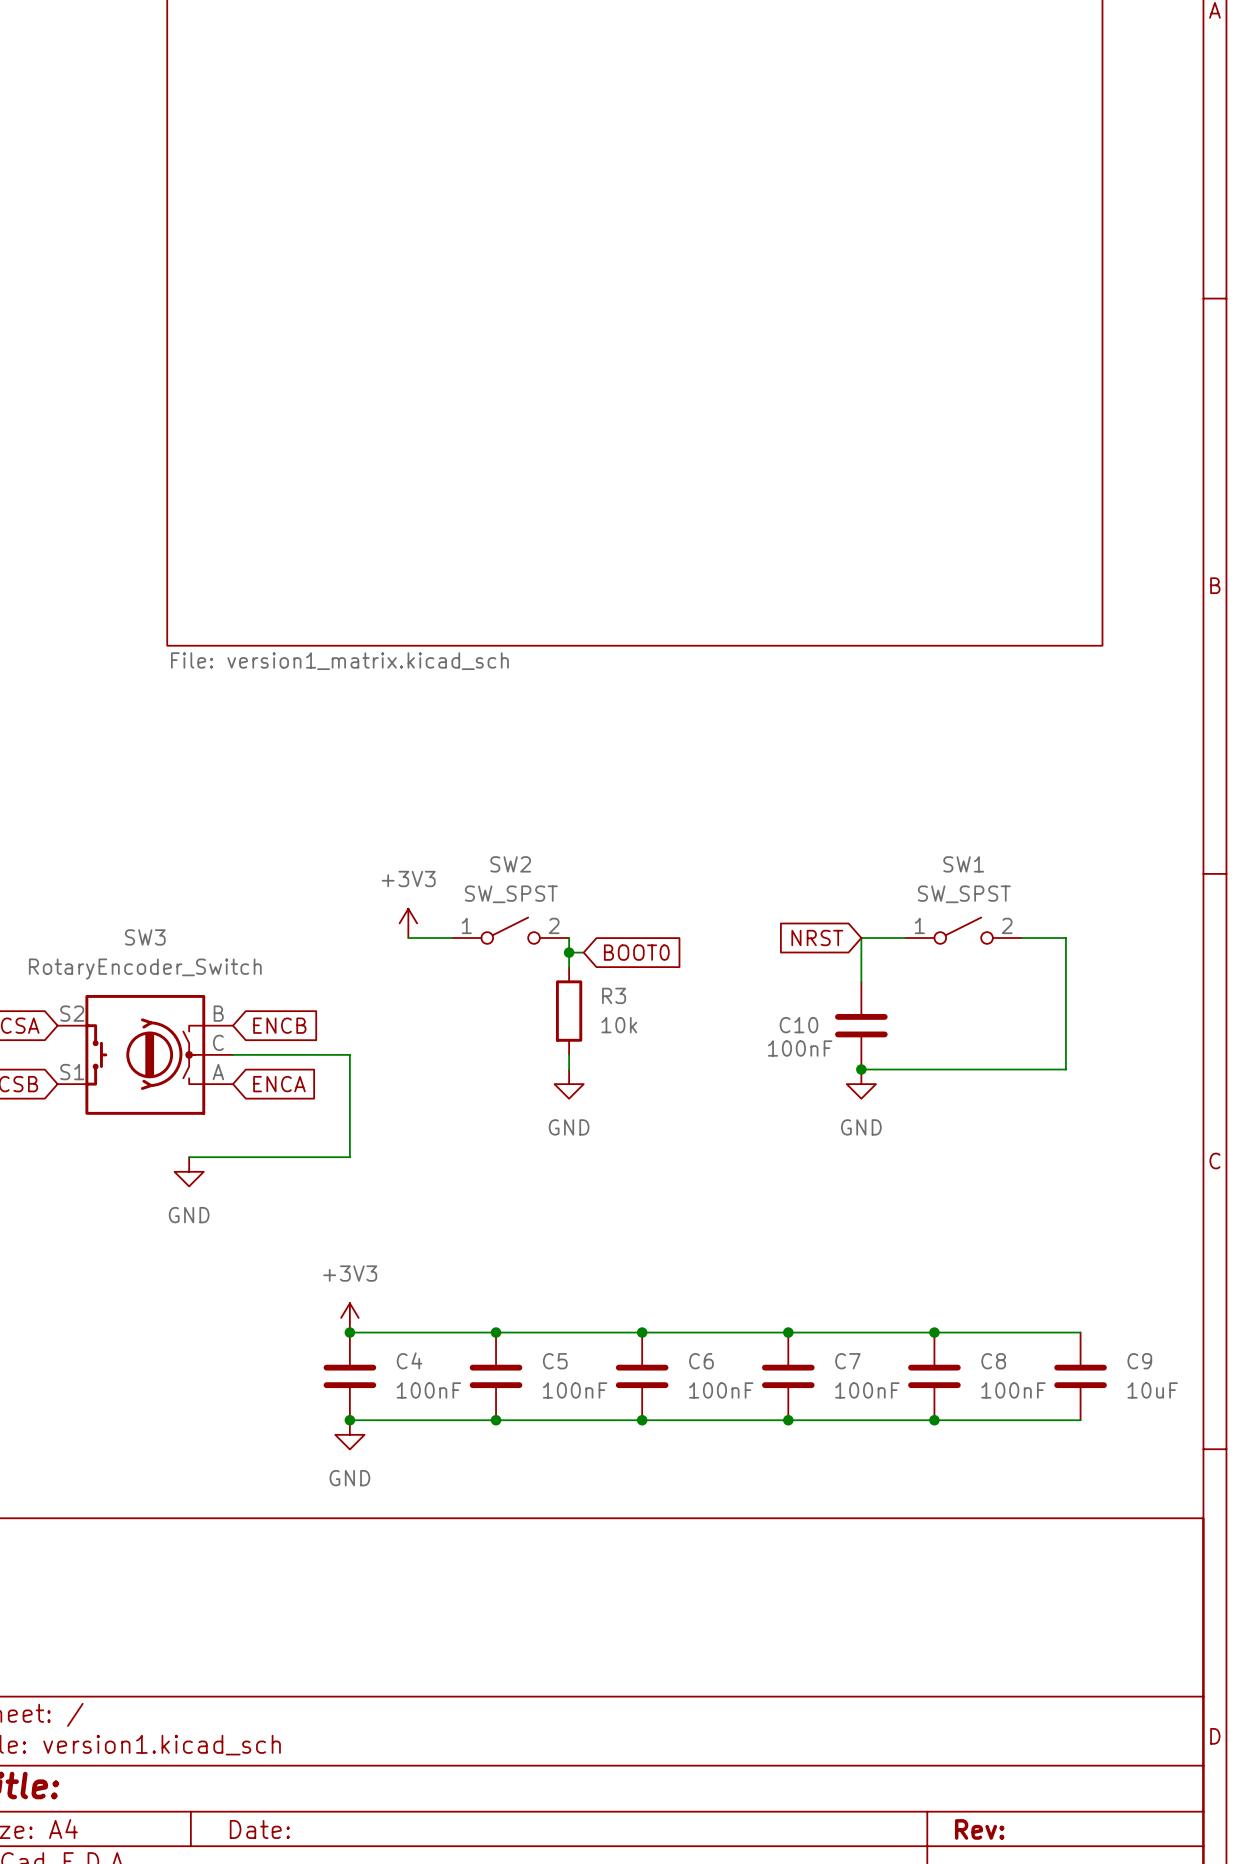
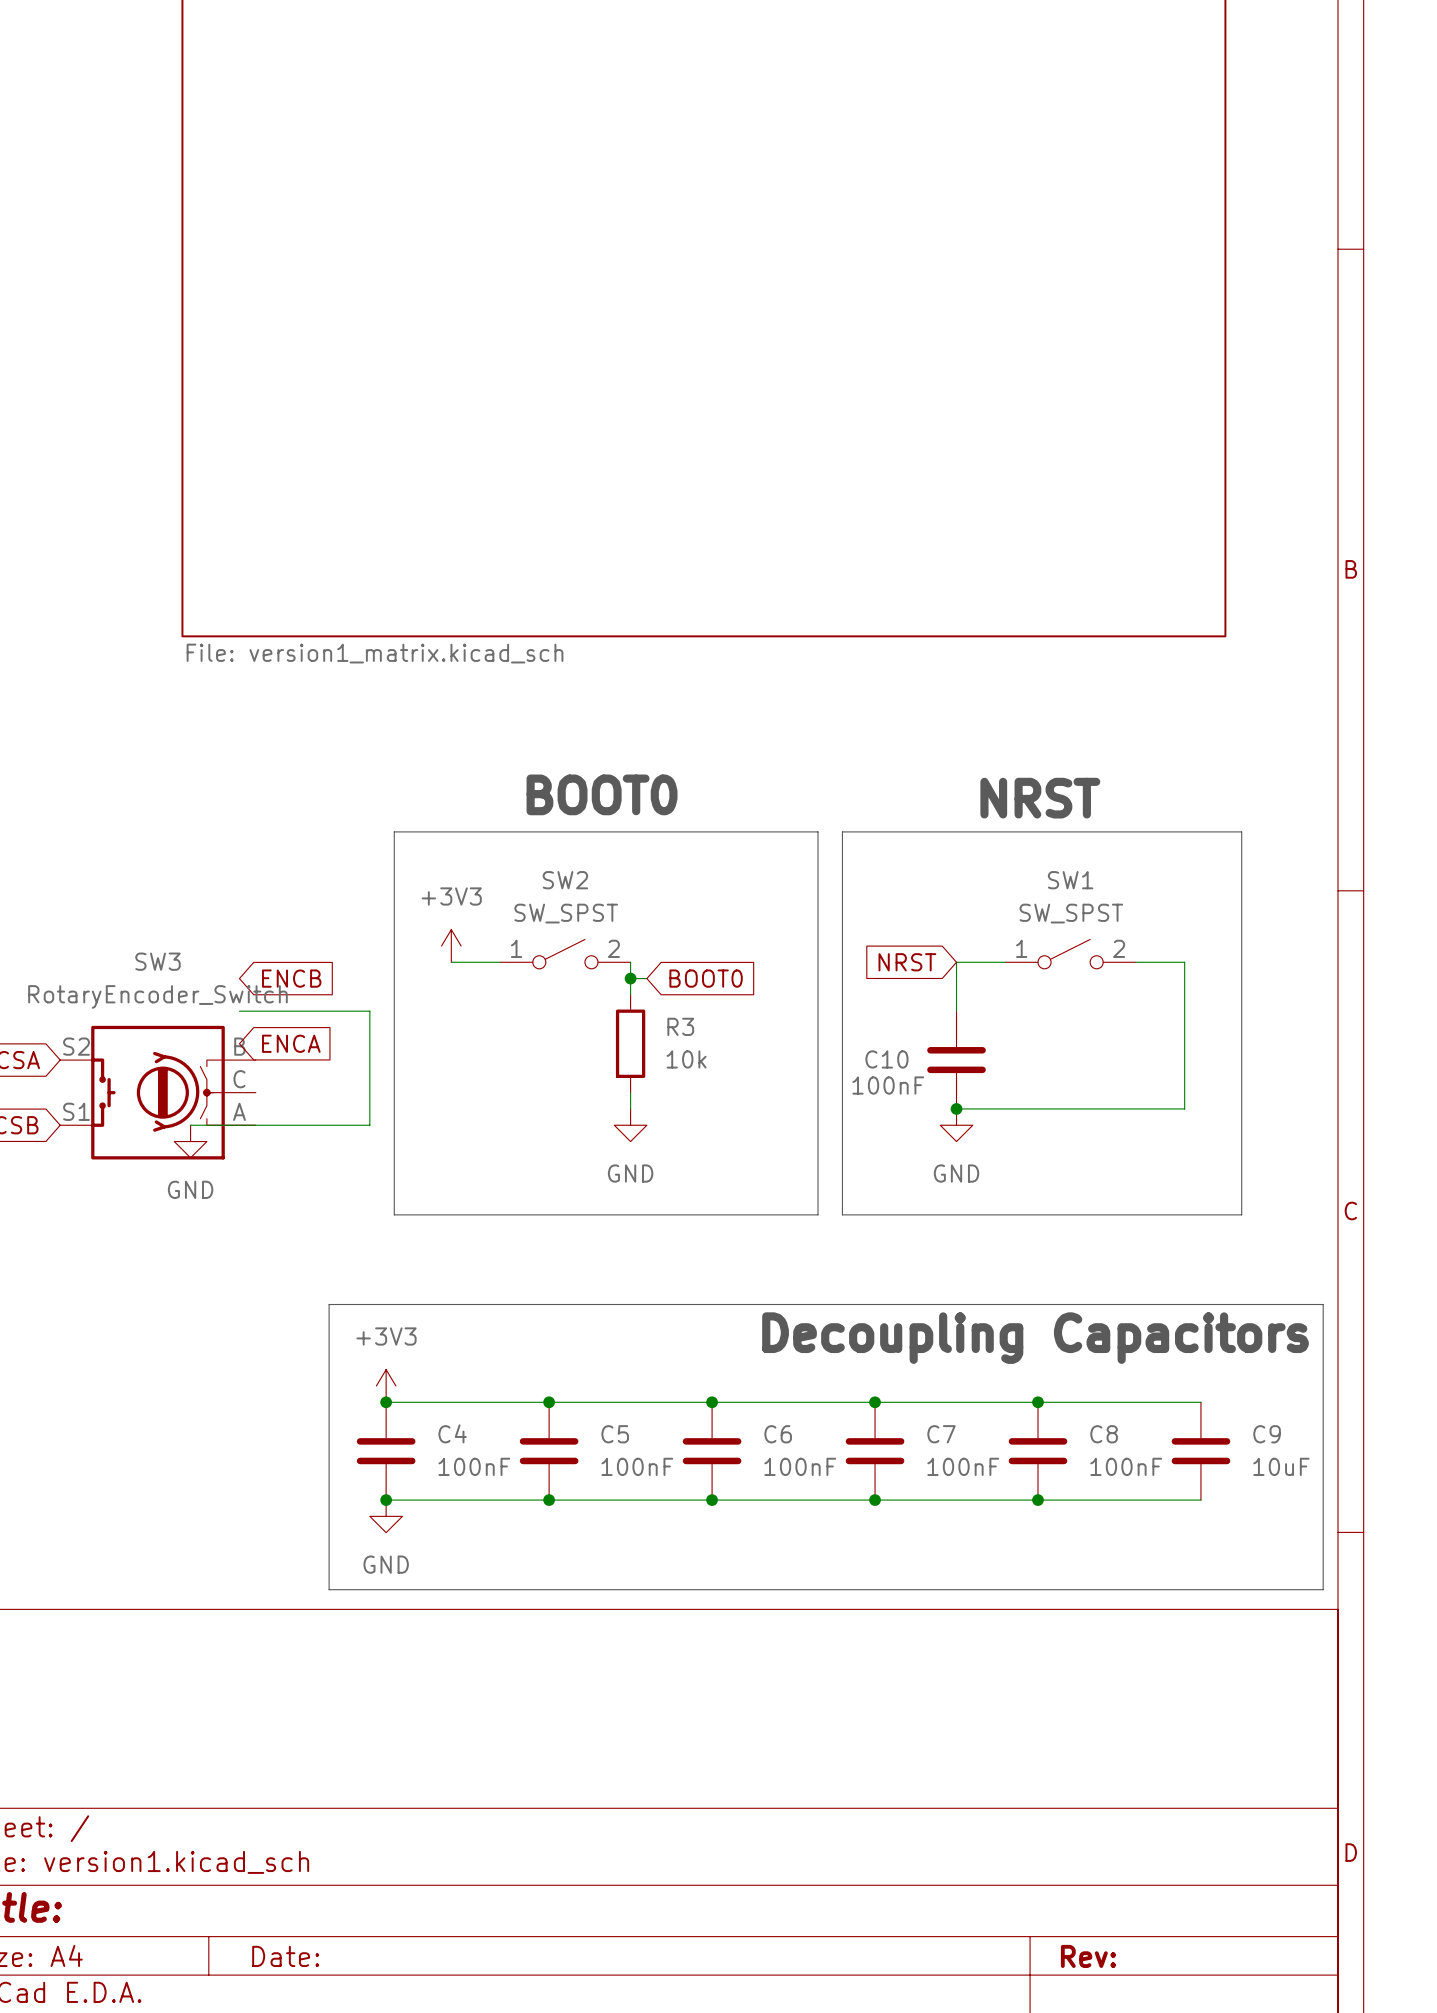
text: none -> BOOT0 (602, 794)
text: none -> NRST (1040, 798)
line: none -> (394, 831) (818, 831) (818, 1214) (394, 1214) (394, 831)
line: none -> (842, 831) (1241, 831) (1241, 1214) (842, 1214) (842, 831)
global label position: ENCB (279, 1025) -> ENCB (291, 978)
wire: (232, 1054) (349, 1054) (349, 1157) (189, 1157) -> (239, 1011) (369, 1011) (369, 1125) (190, 1125)
global label position: ENCA (279, 1084) -> ENCA (291, 1043)
power symbol position: GND (189, 1171) -> GND (190, 1141)
line: none -> (329, 1304) (1323, 1304) (1323, 1589) (329, 1589) (329, 1304)
text: none -> Decoupling Capacitors (1035, 1338)

